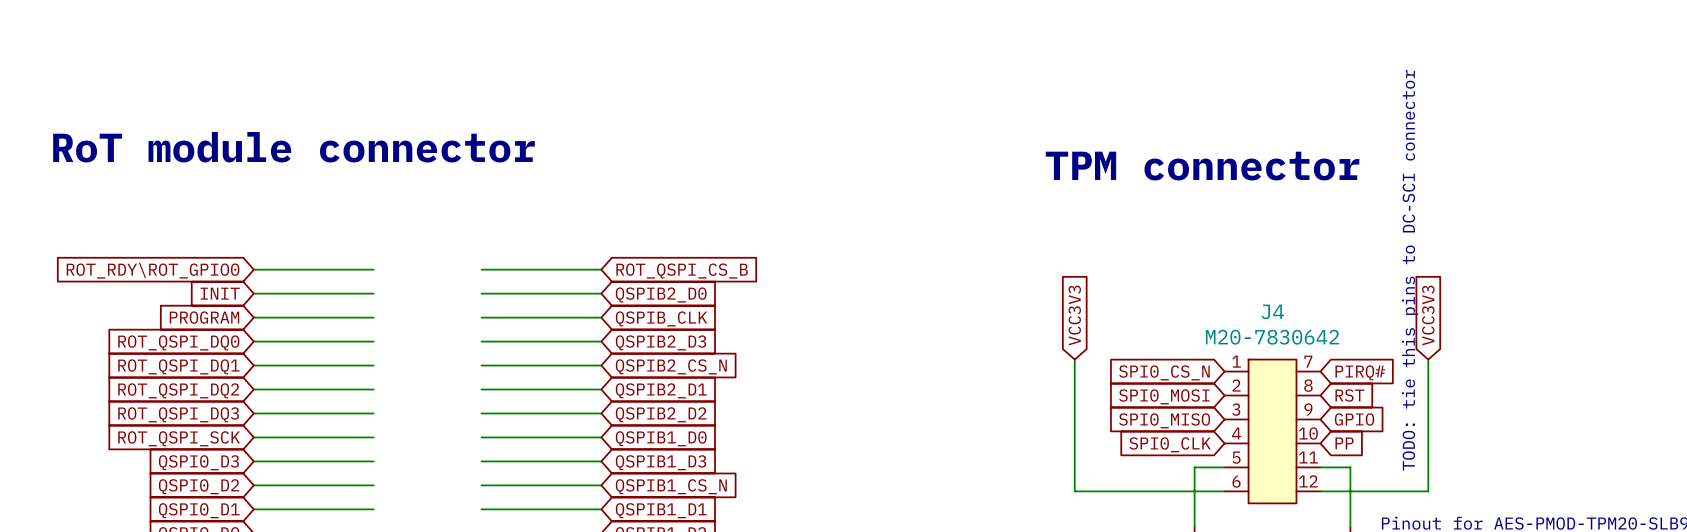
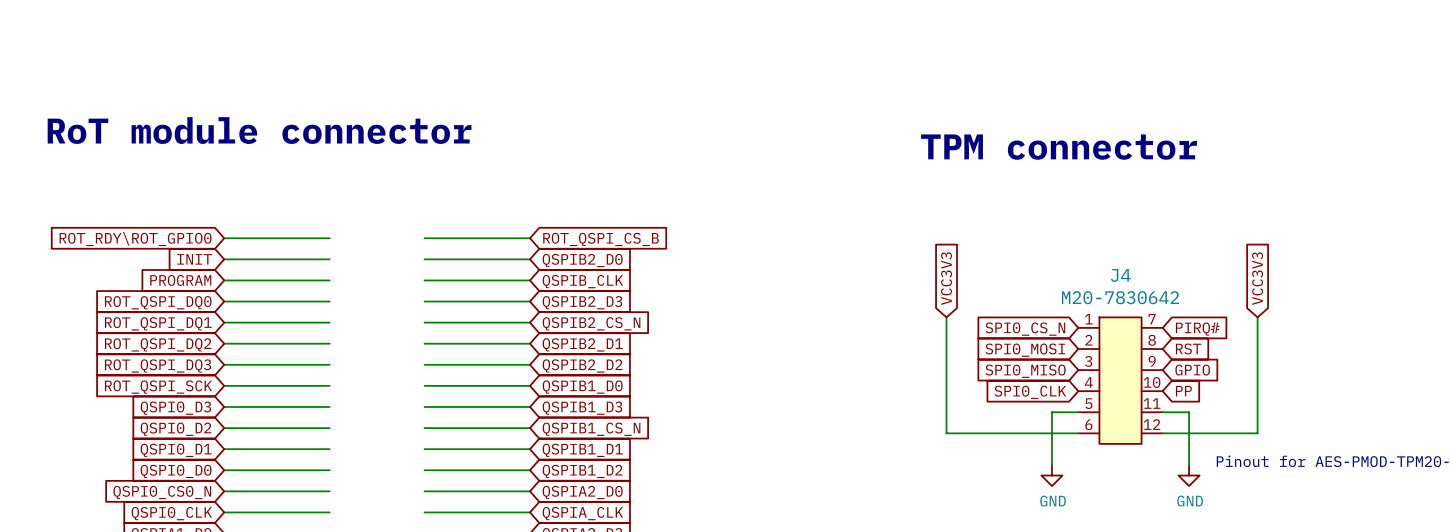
text: TODO: tie this pins to DC-SCI connector (1410, 270) -> none

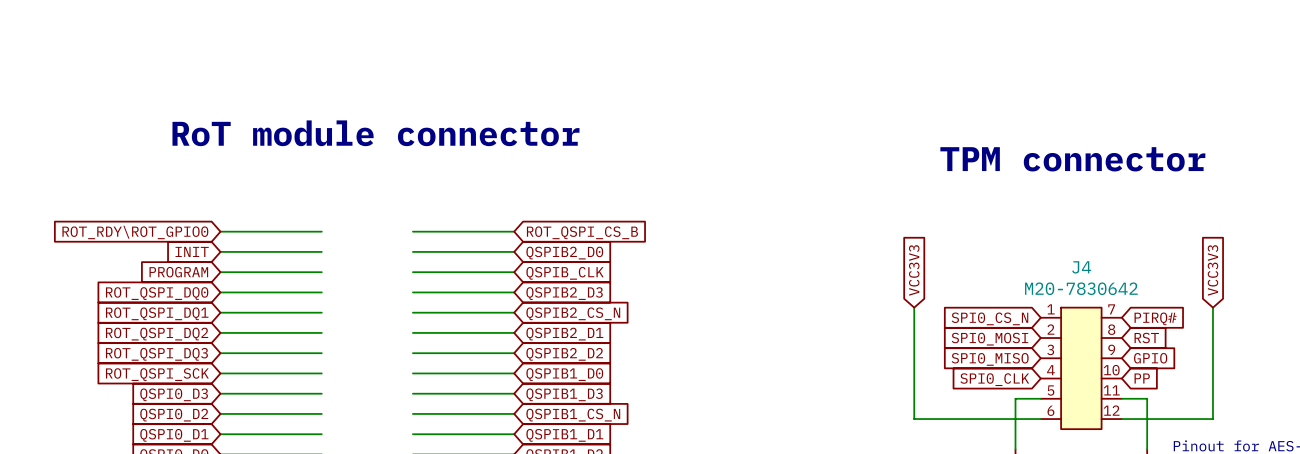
text position: RoT module connector (259, 130) -> RoT module connector (375, 133)
text position: TPM connector (1058, 147) -> TPM connector (1072, 159)

